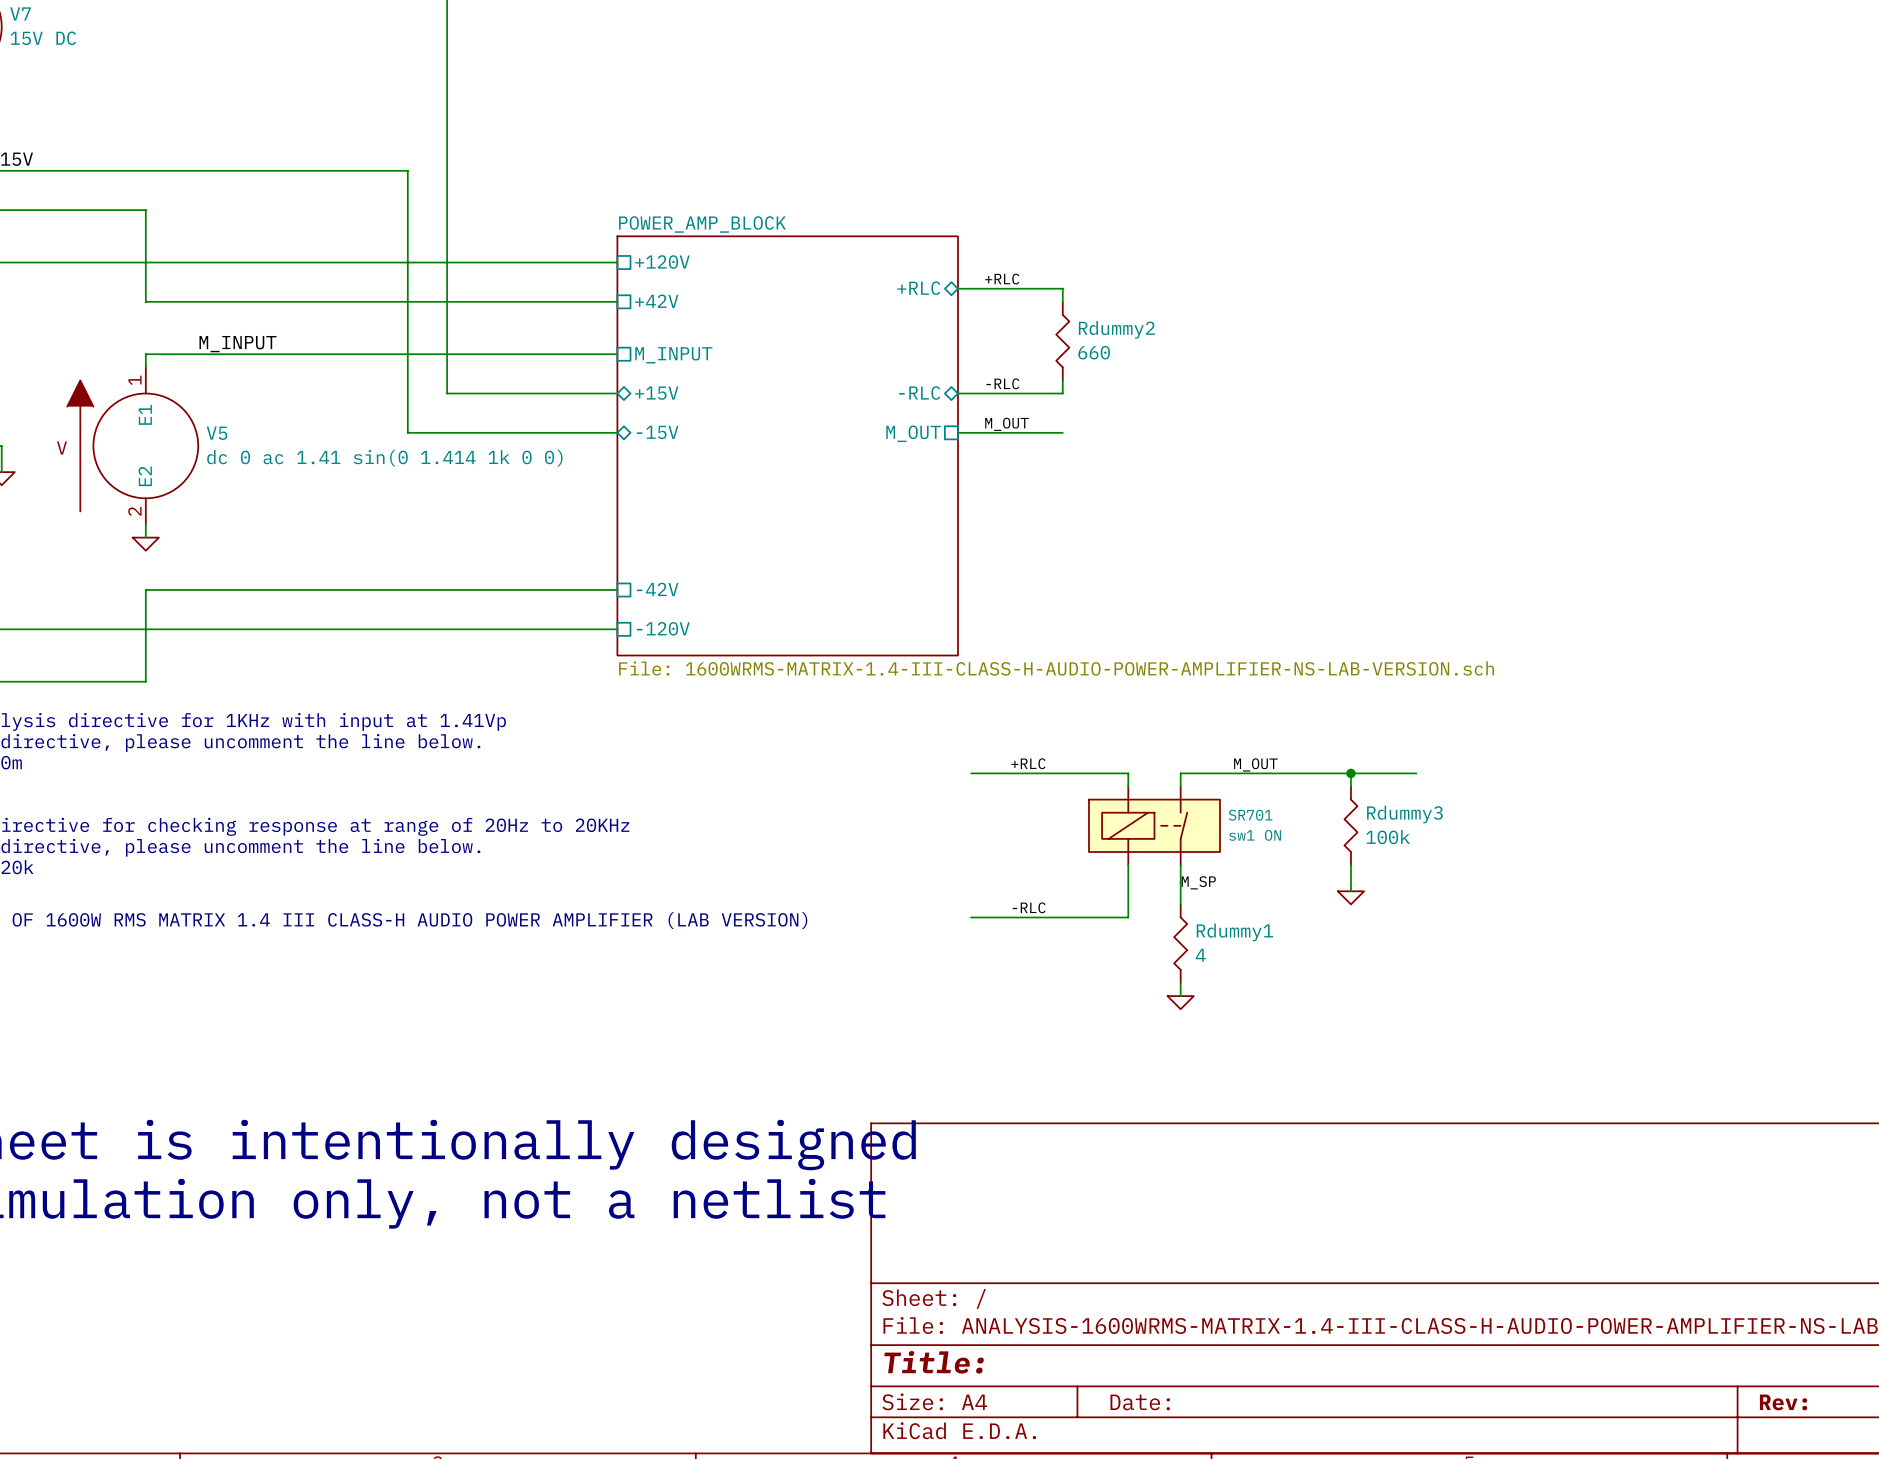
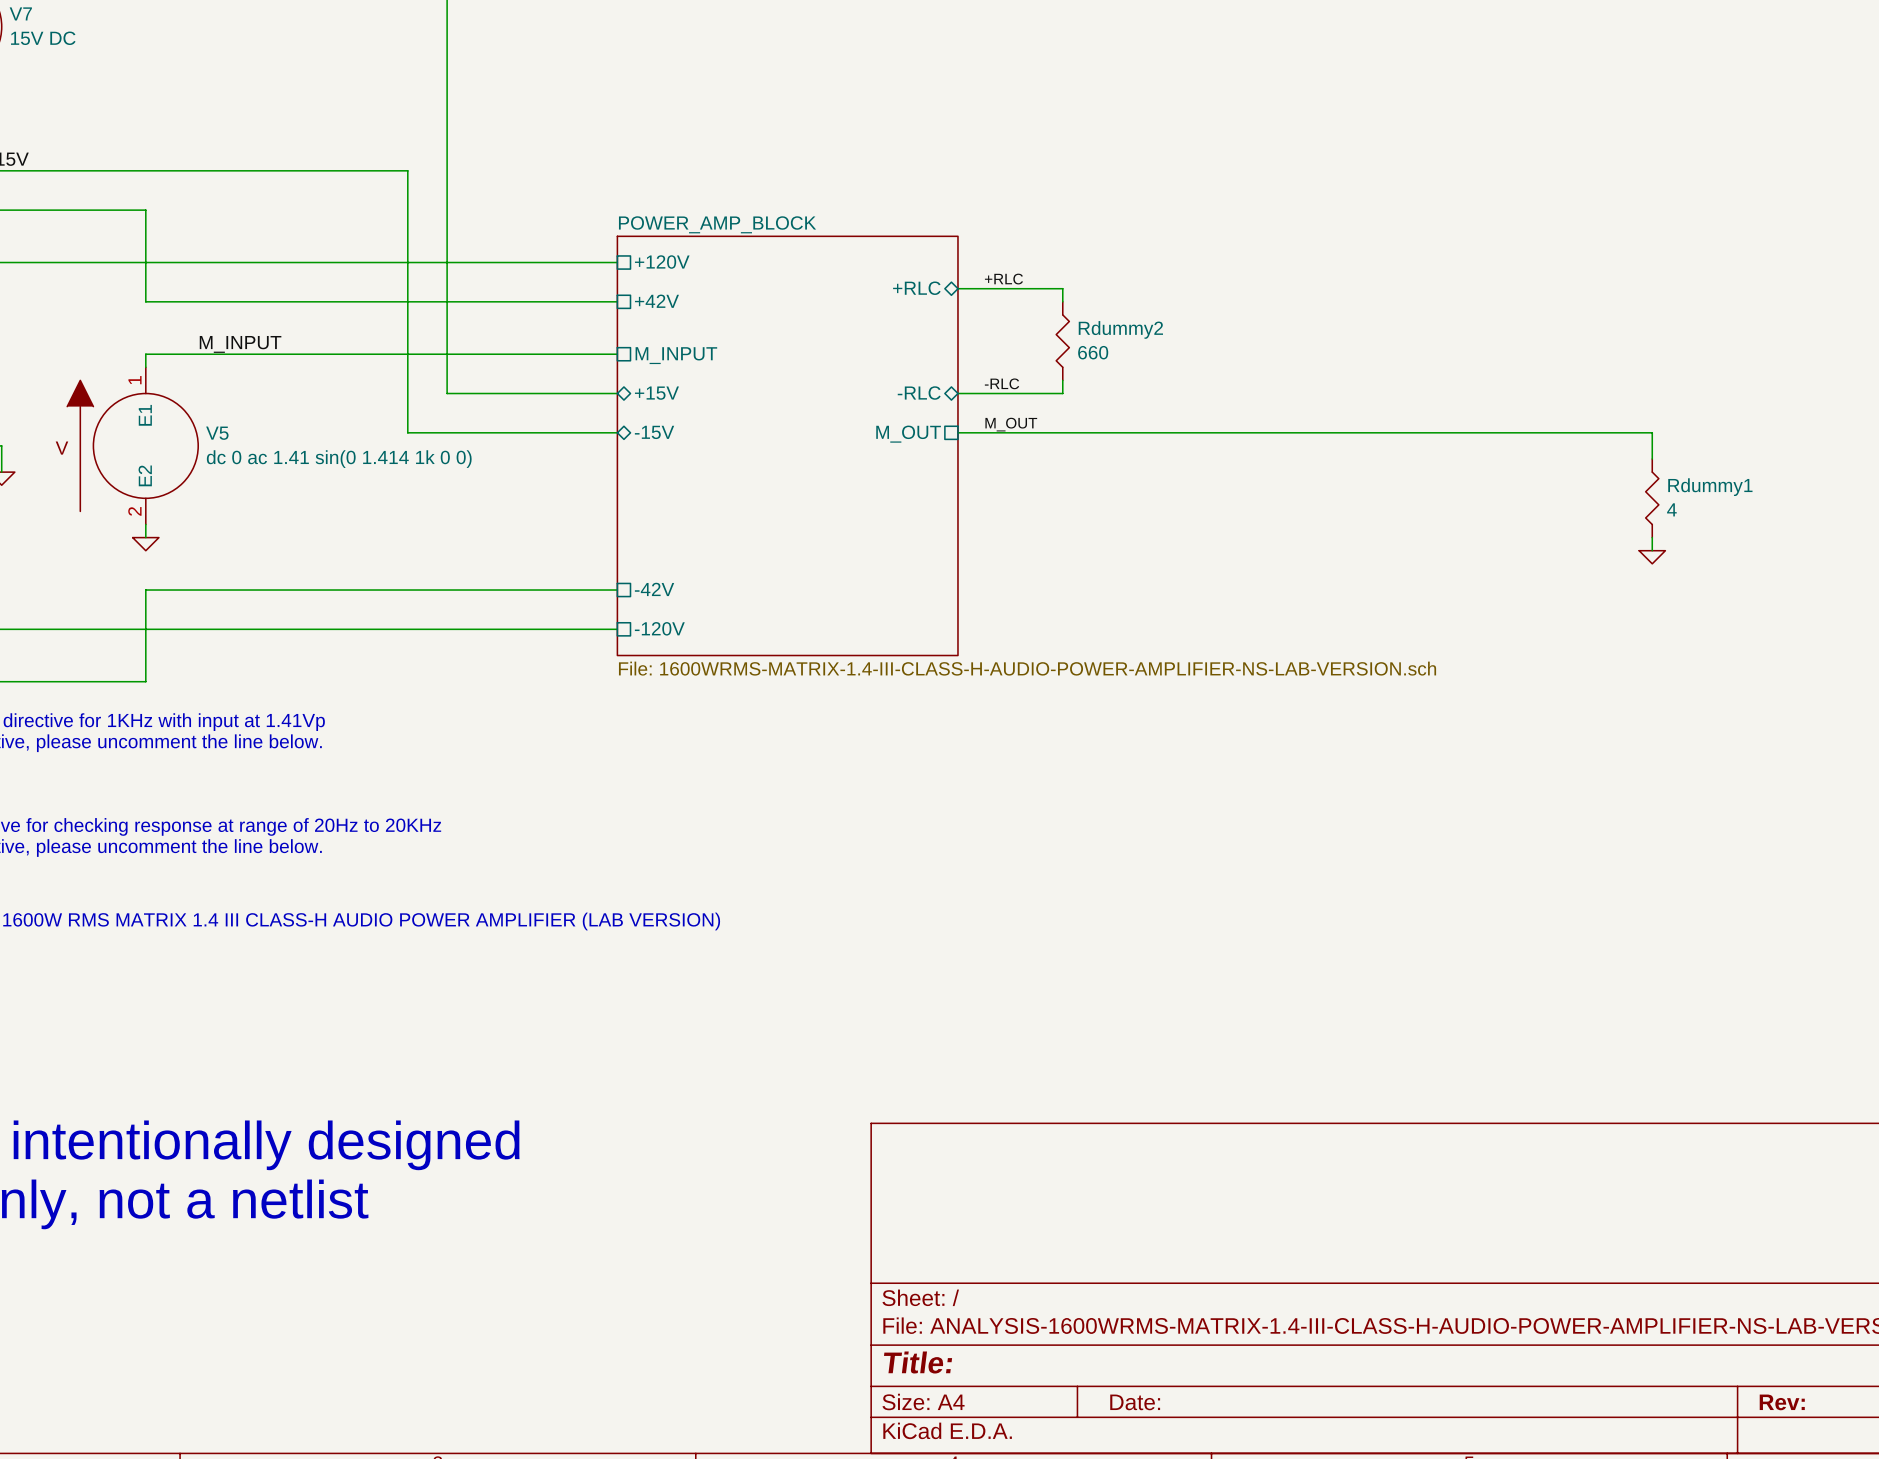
wire: none -> (1062, 432) (1652, 432) (1652, 459)
wire: none -> (1652, 537) (1652, 550)
power symbol: none -> (1652, 557)
label: +RLC (1028, 763) -> none
label: M_OUT (1255, 764) -> none
wire: (971, 773) (1128, 773) (1128, 786) -> none
wire: (1350, 773) (1350, 786) -> none
junction: (1350, 773) -> none
wire: (1416, 773) (1180, 773) (1180, 786) -> none
SR701: sw1 ON (1154, 825) -> none
Rdummy3: 100k (1350, 825) -> none
wire: (1128, 865) (1128, 917) (971, 917) -> none
wire: (1180, 865) (1180, 904) -> none
wire: (1350, 865) (1350, 891) -> none
label: M_SP (1198, 882) -> none
power symbol: (1350, 897) -> none
label: -RLC (1029, 907) -> none
Rdummy1 position: (1180, 943) -> (1652, 498)
wire: (1180, 983) (1180, 996) -> none
power symbol: (1180, 1002) -> none

